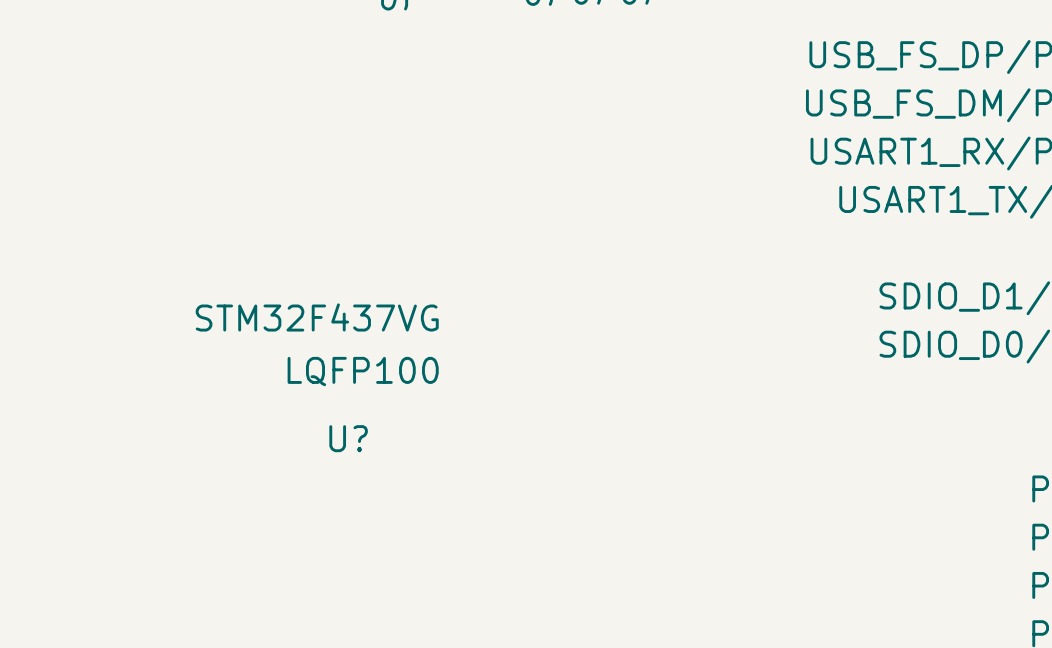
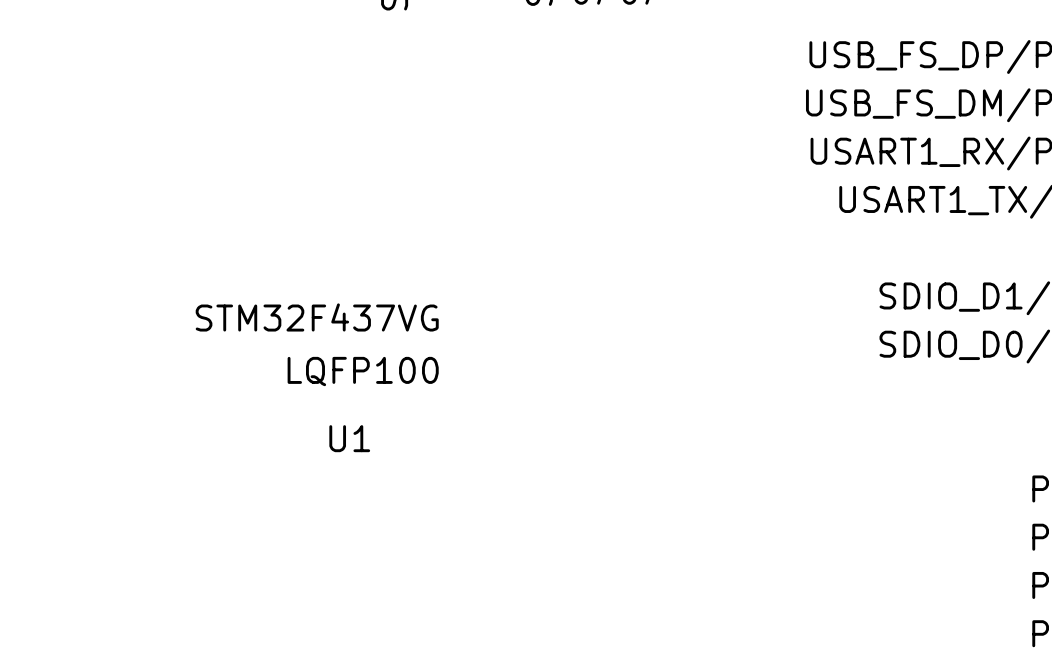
U? name: U? (348, 438) -> U1 (349, 438)

